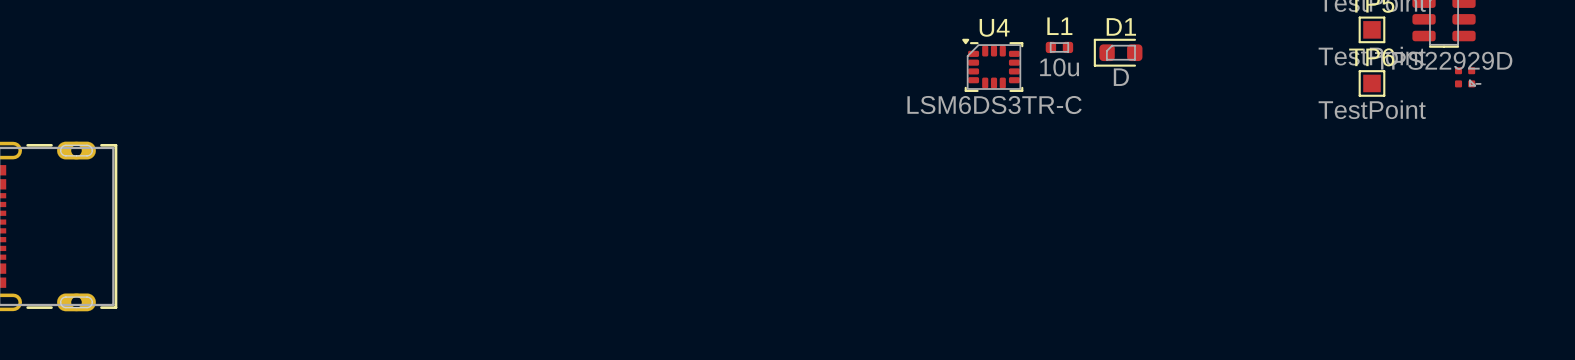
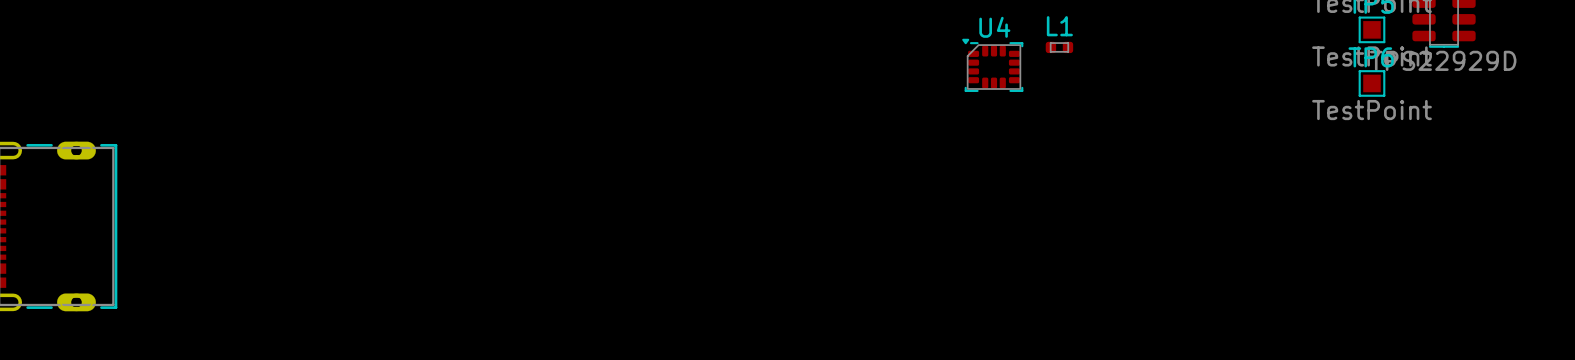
D1: D (1118, 52) -> none
L1 value: 10u (1059, 67) -> none
part: (1468, 77) -> none
U4 value: LSM6DS3TR-C (994, 105) -> none

